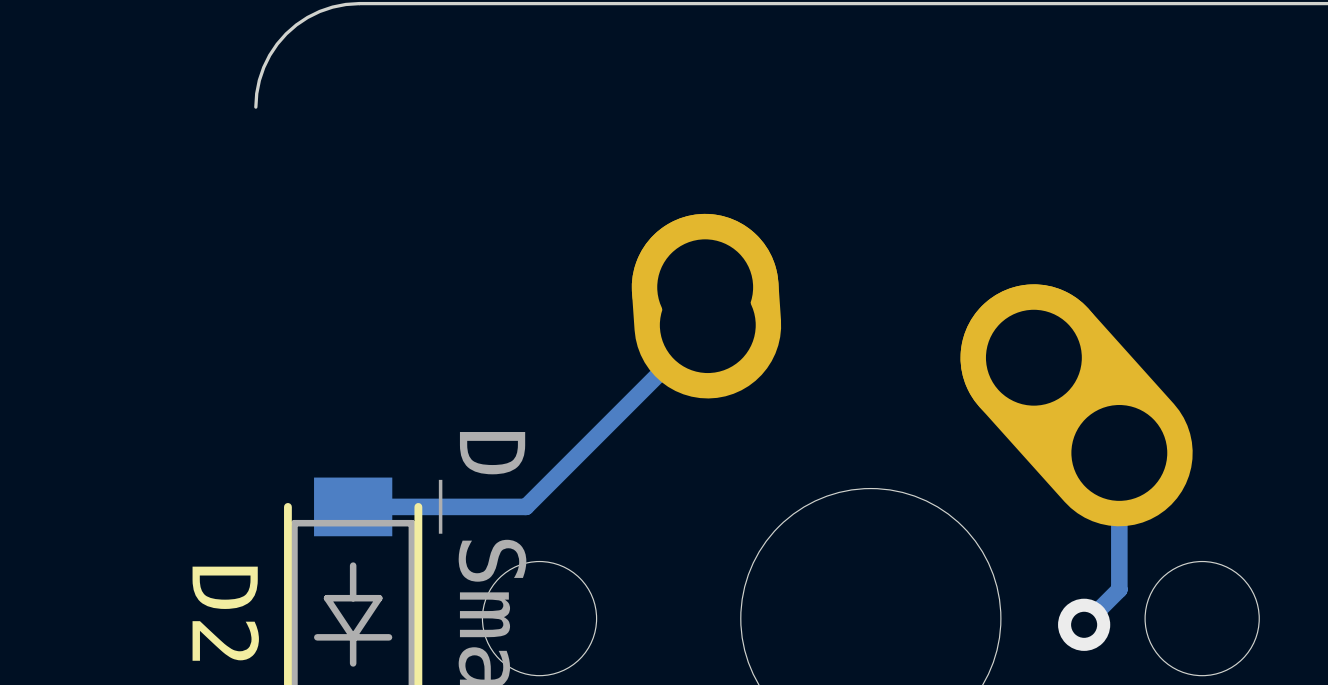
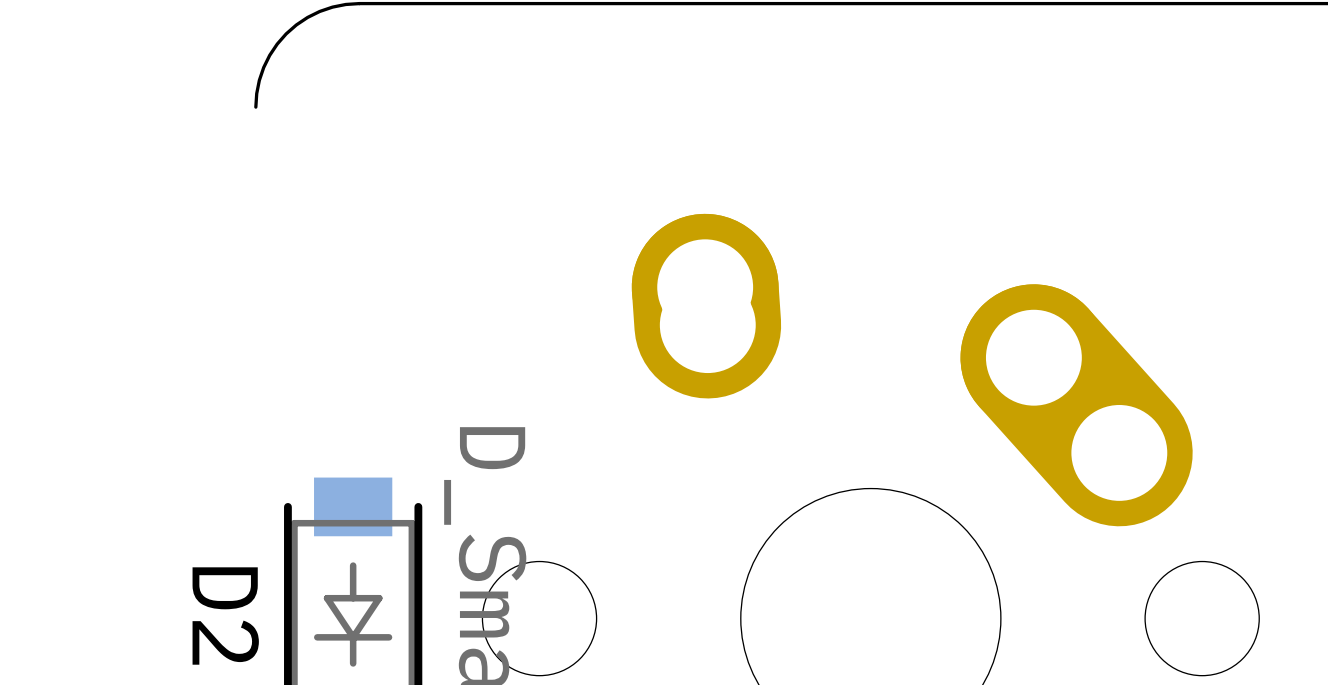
track: (707, 325) (525, 506) (353, 506) -> none
track: (1119, 452) (1119, 589) (1084, 624) -> none
via: (1084, 624) -> none

